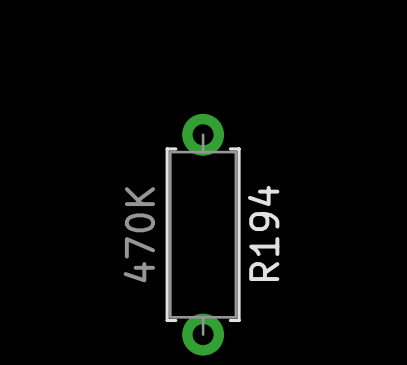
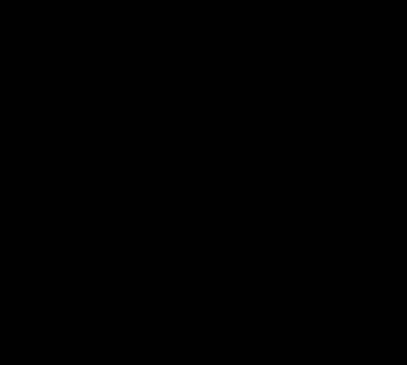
R194: 470K (203, 234) -> none

